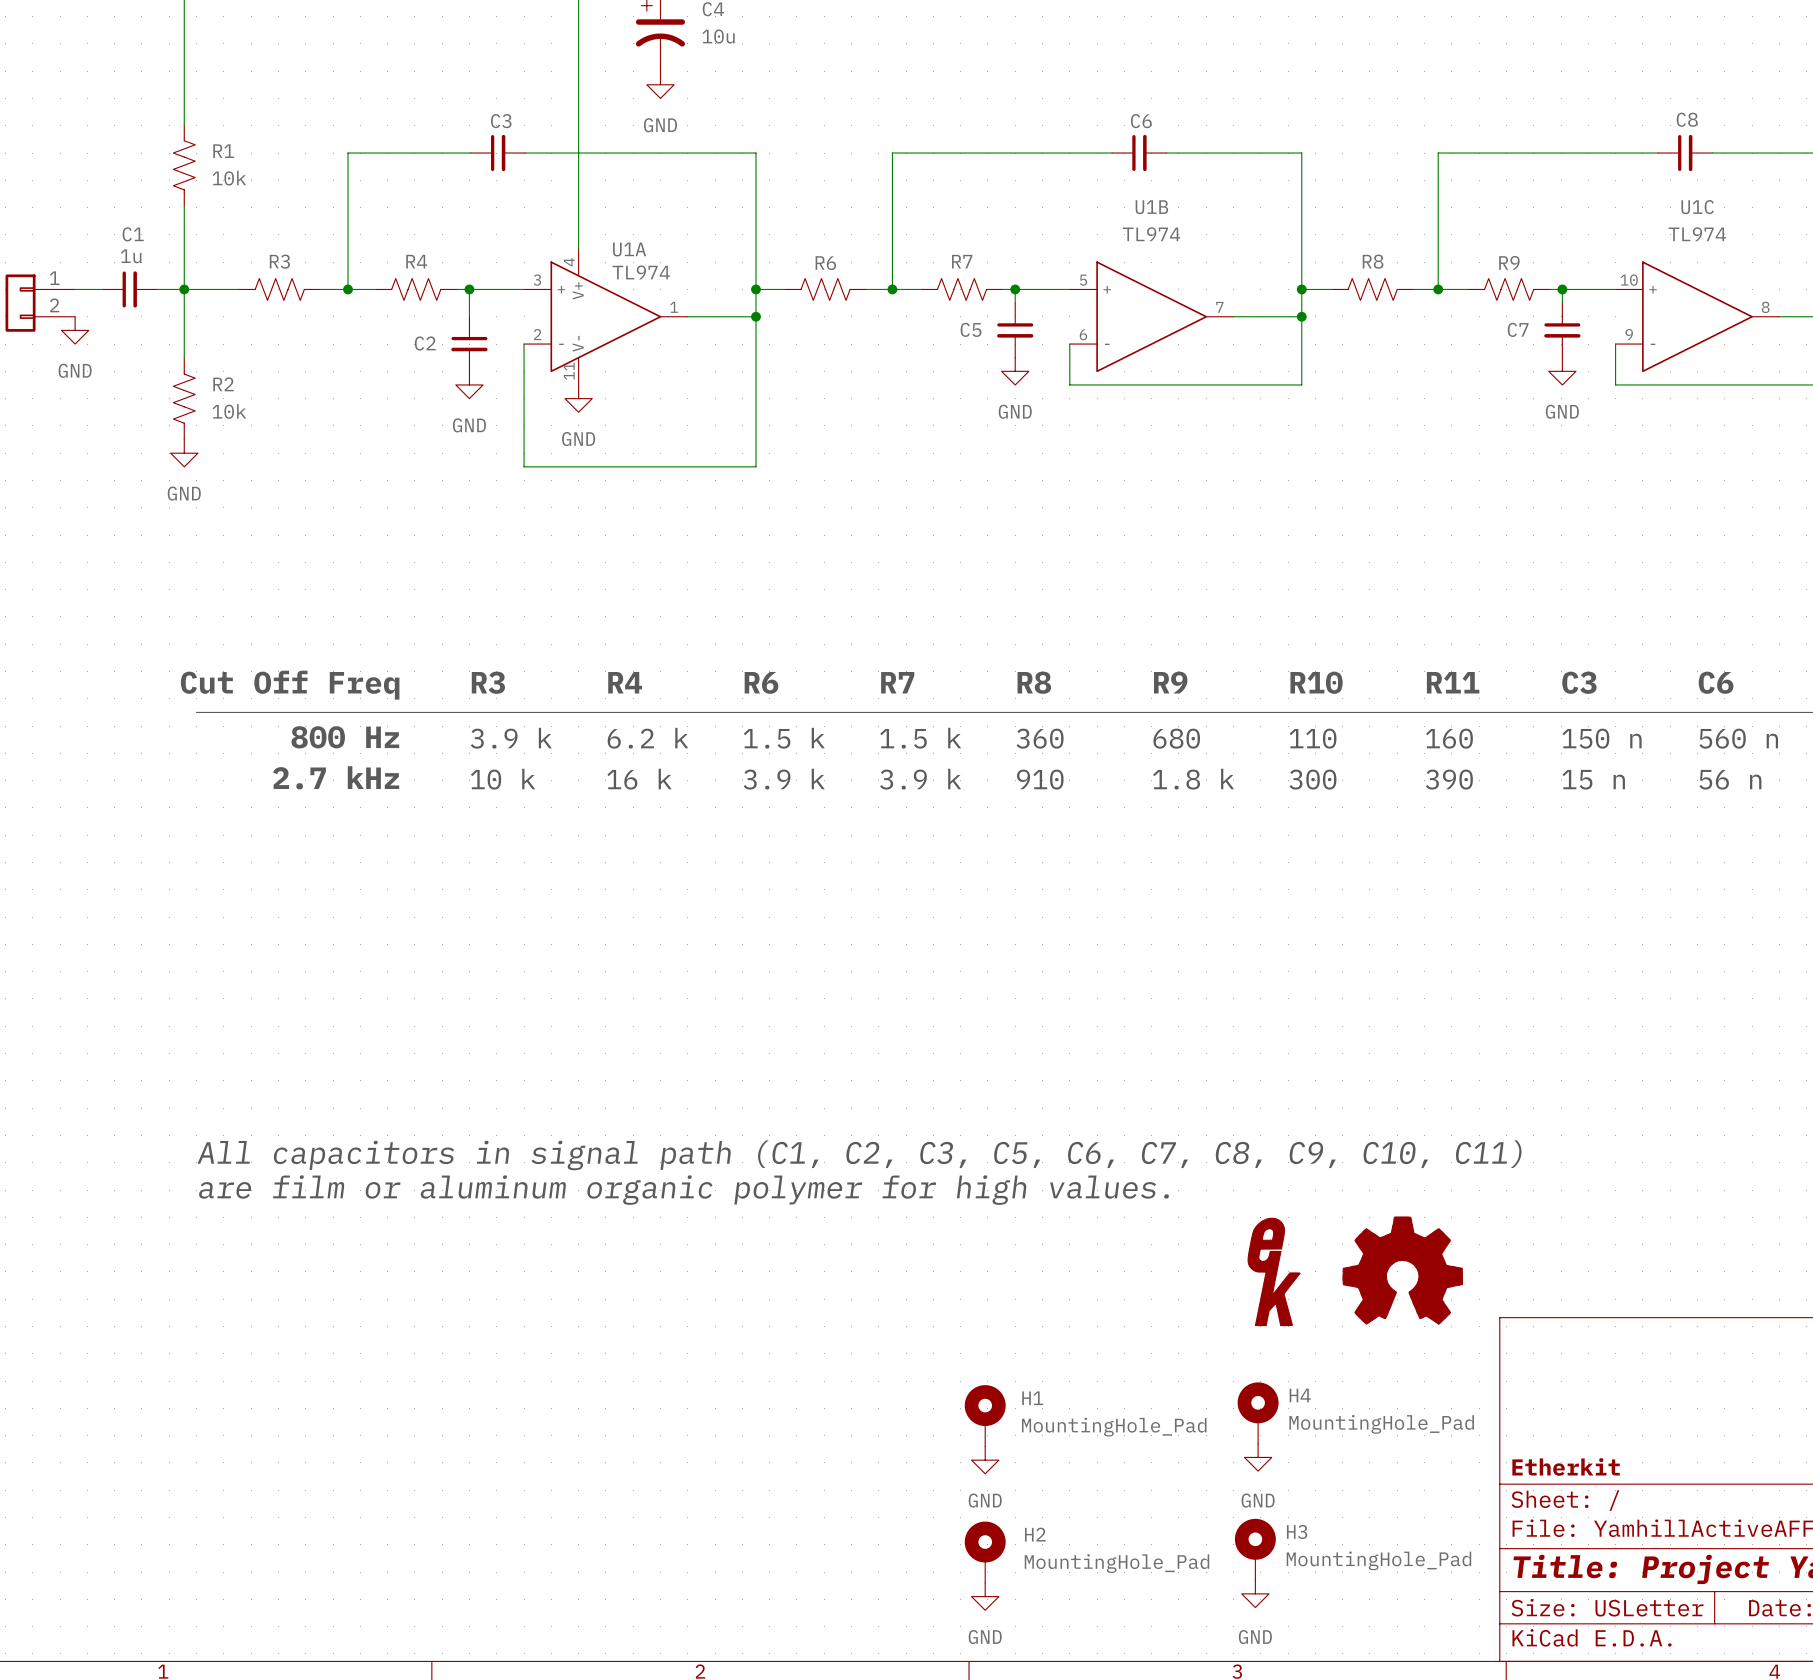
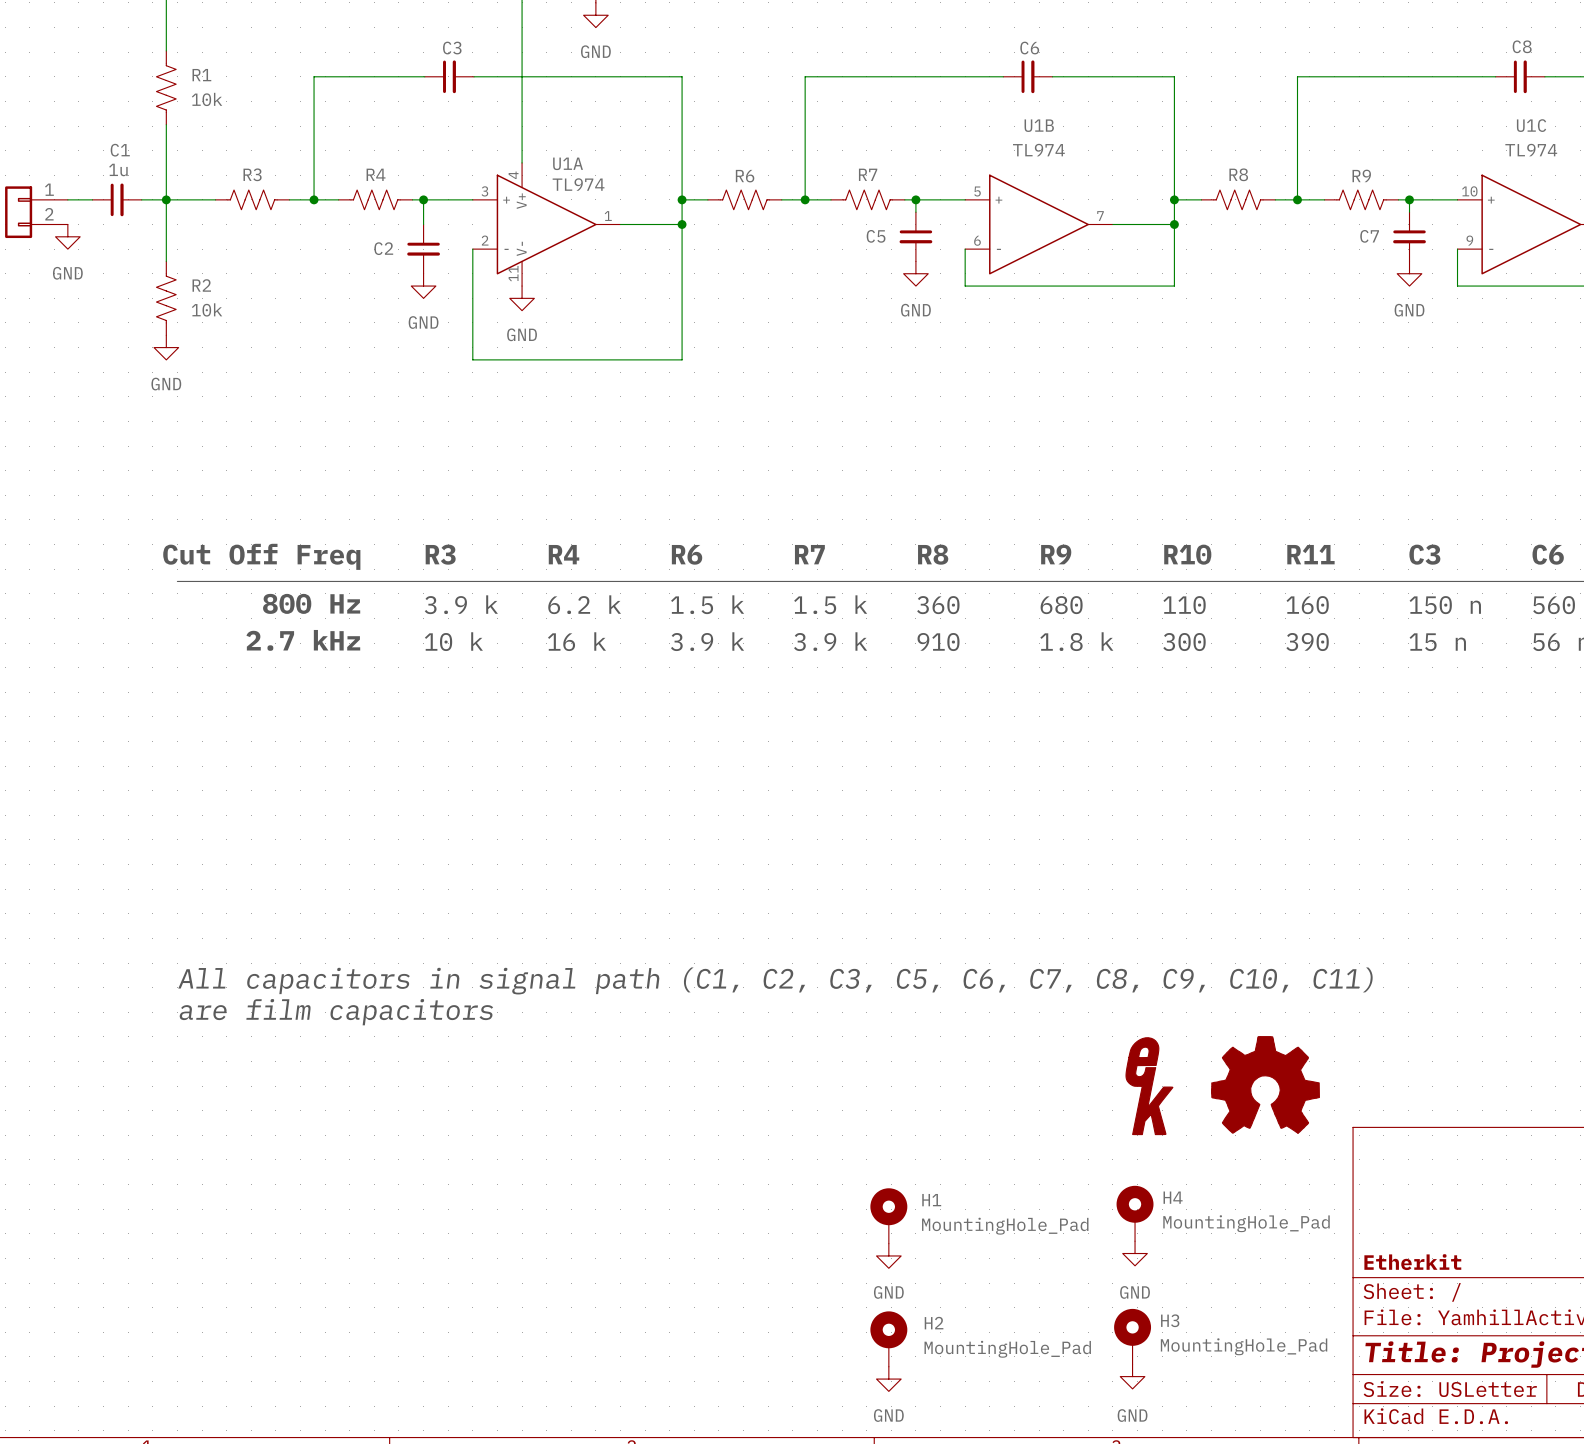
text: are film or aluminum organic polymer for high values. (683, 1190) -> are film capacitors (336, 1012)

